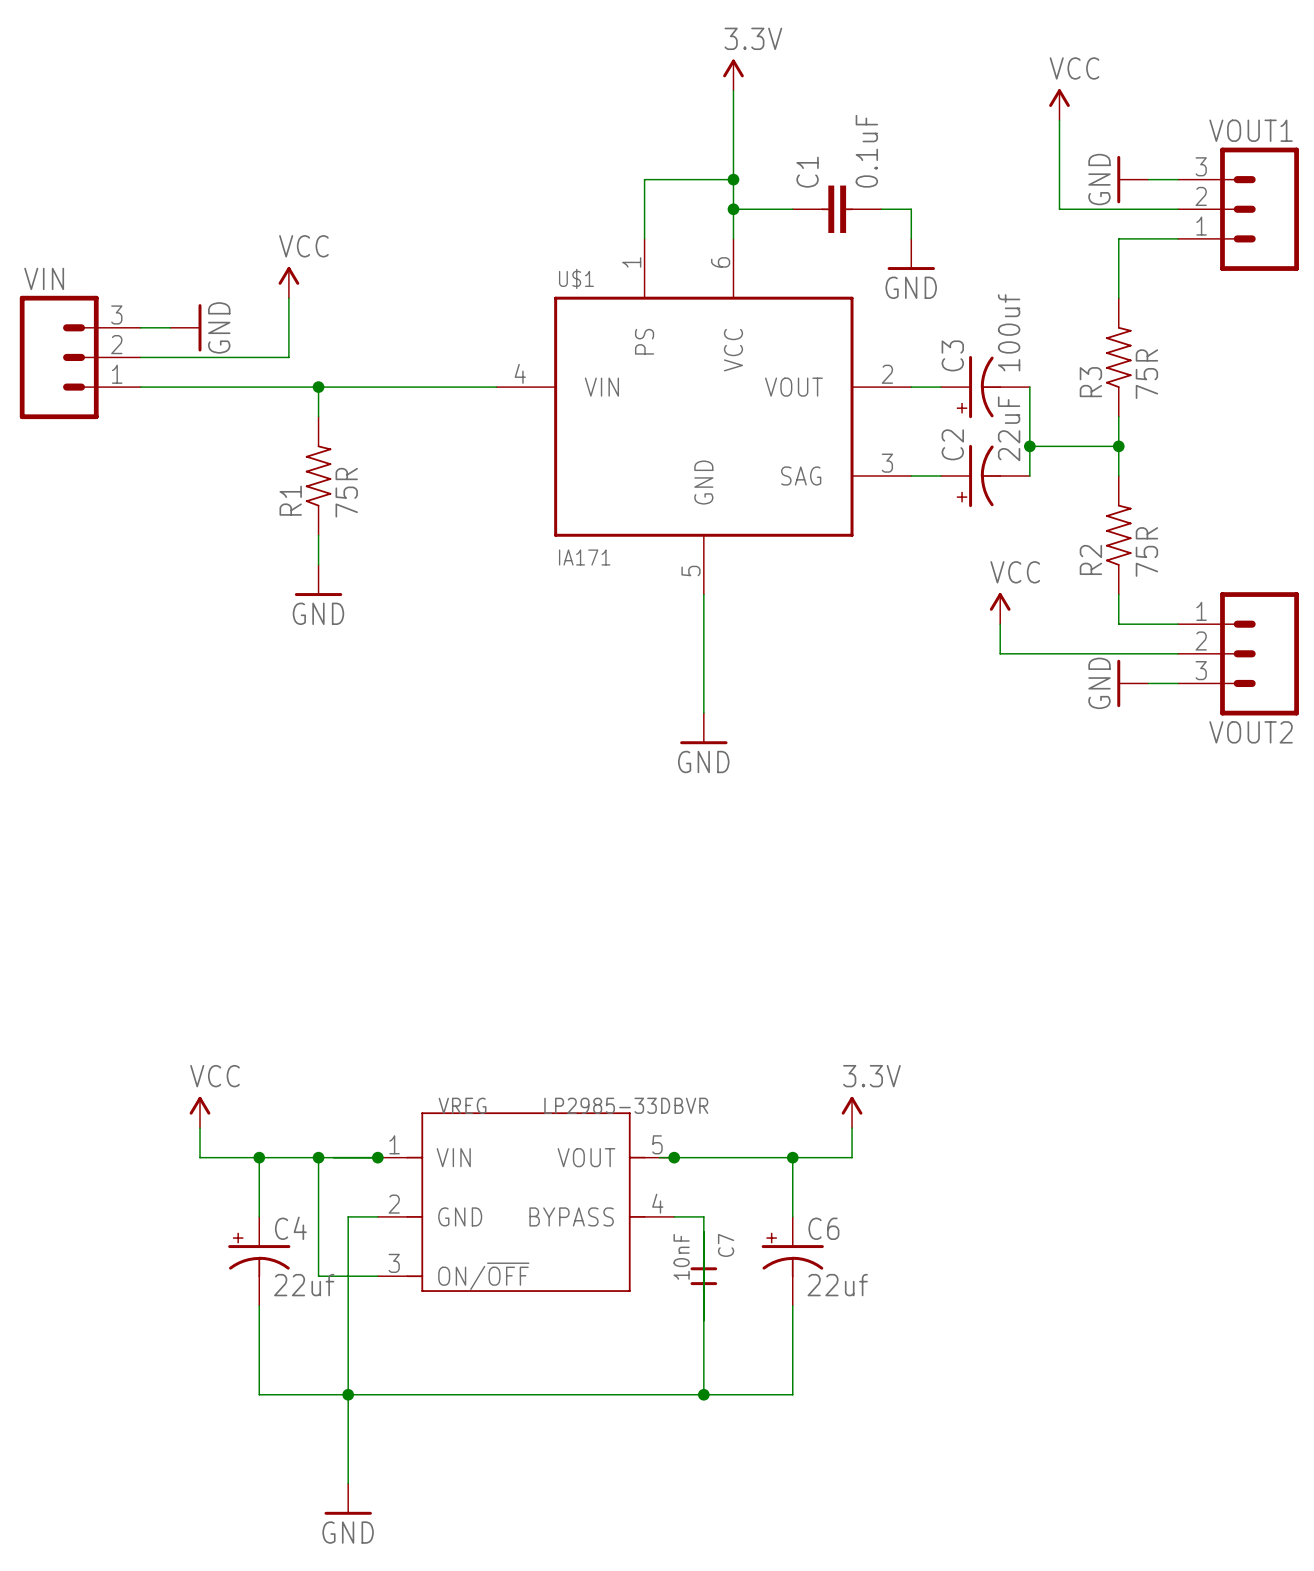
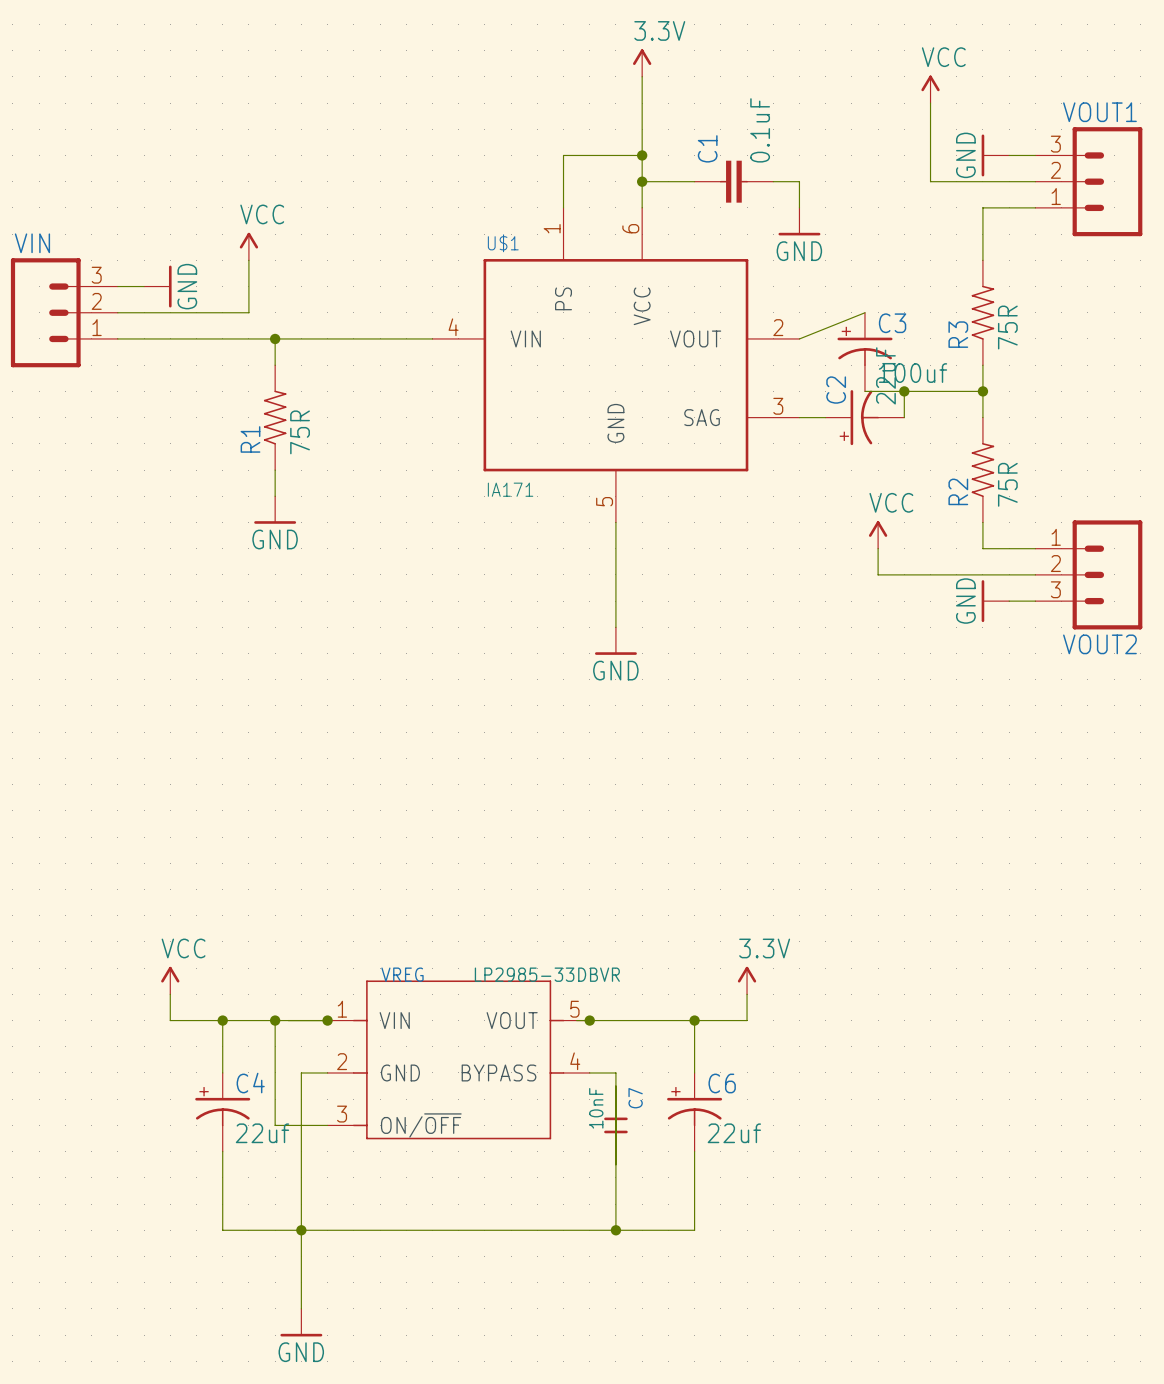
wire: (911, 387) (940, 387) -> (799, 338) (864, 312)
C3 rotation: 0° (978, 387) -> 90° clockwise (864, 346)
wire: (1029, 387) (1029, 446) -> (864, 391) (904, 391)

